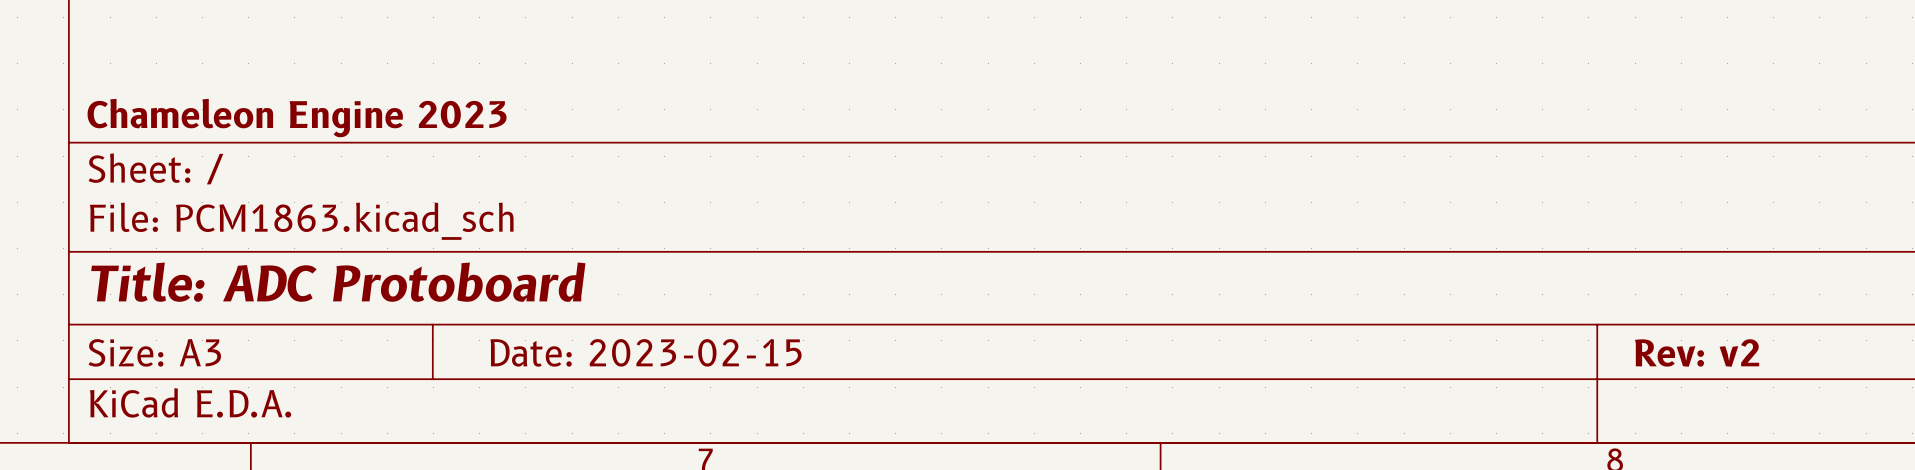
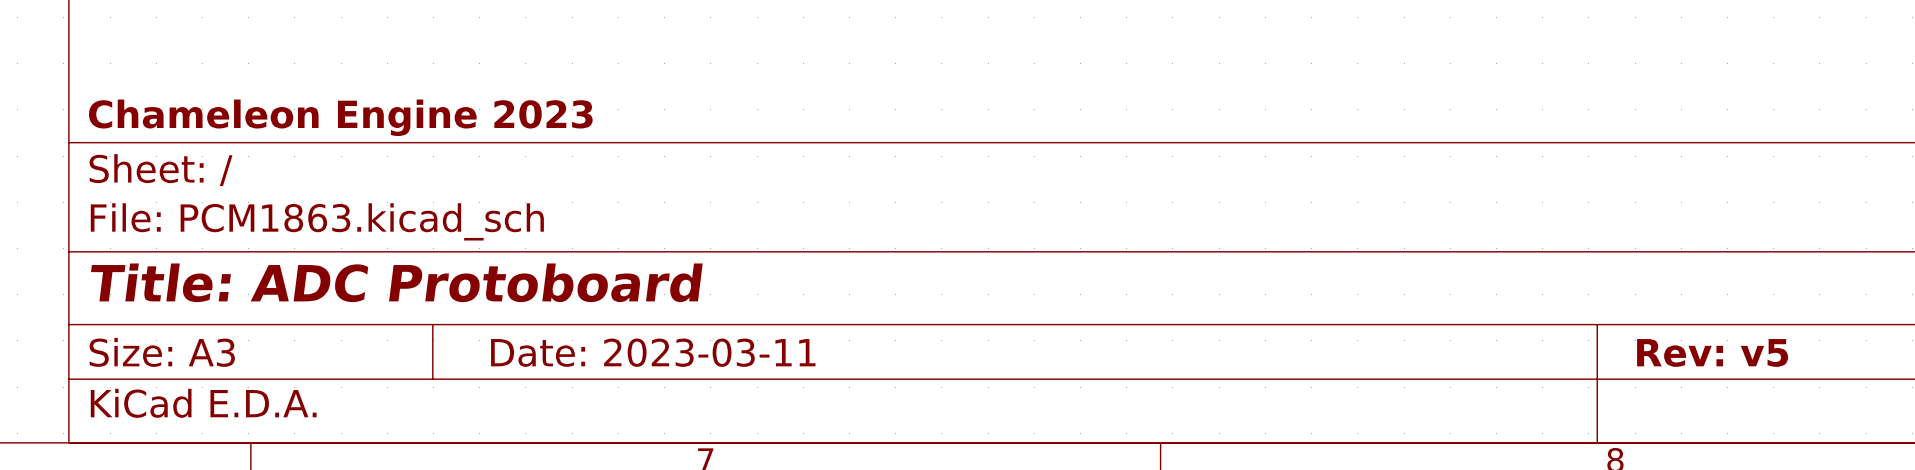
title block: Date: 2023-02-15 (646, 352) -> Date: 2023-03-11 (653, 352)
title block: Rev: v2 (1697, 352) -> Rev: v5 (1712, 352)

